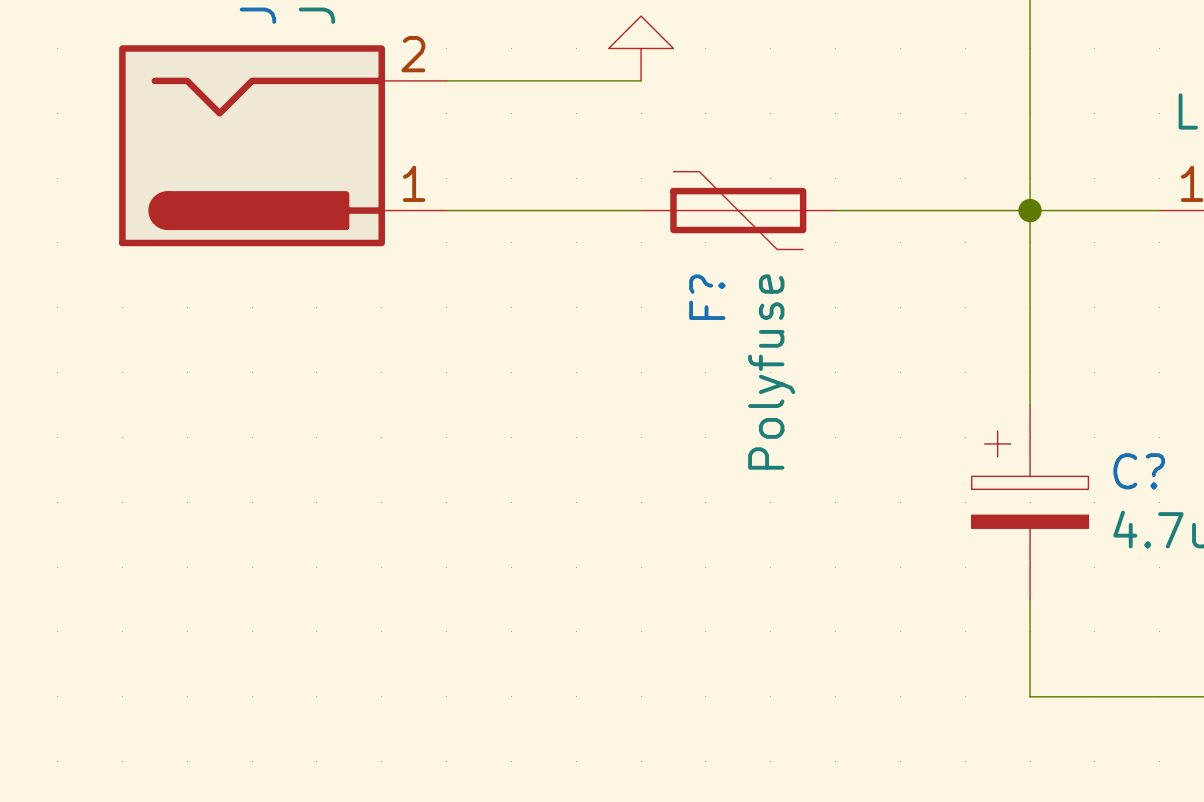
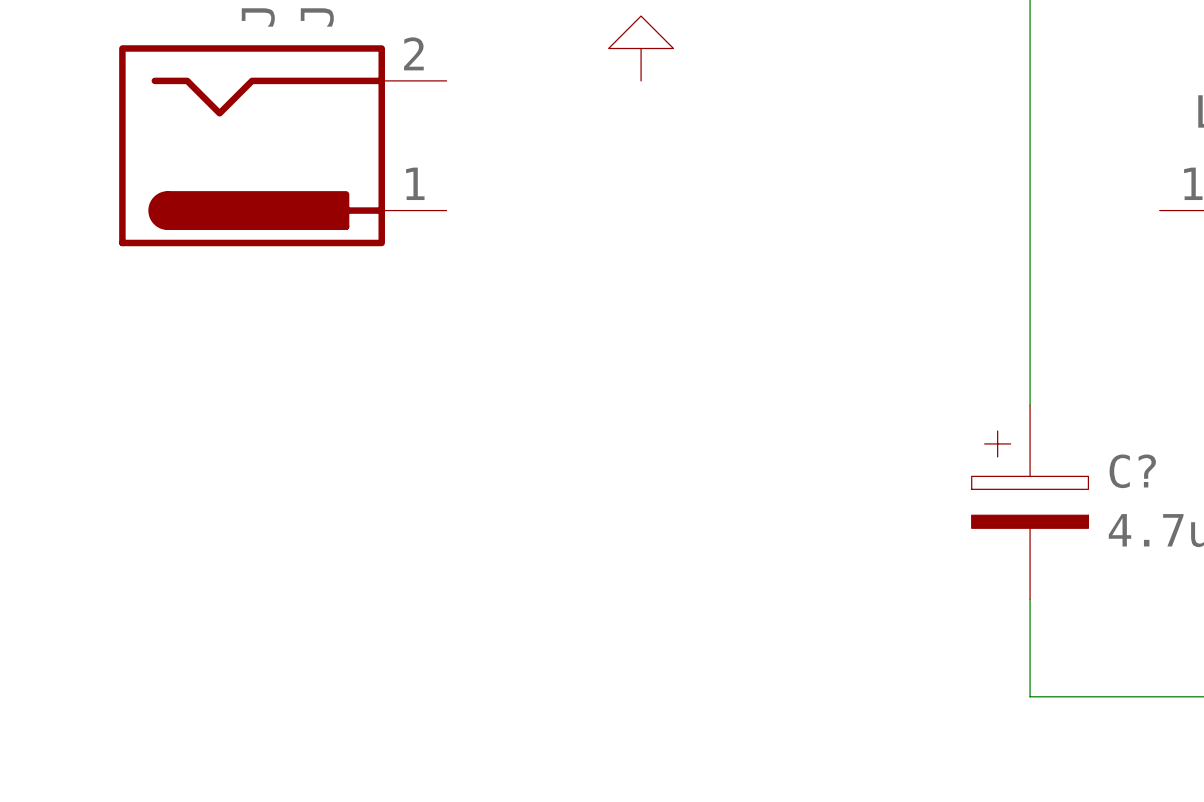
wire: (446, 80) (641, 80) -> none
wire: (446, 210) (641, 210) -> none
F?: Polyfuse (738, 210) -> none
wire: (835, 210) (1159, 210) -> none
junction: (1030, 210) -> none

